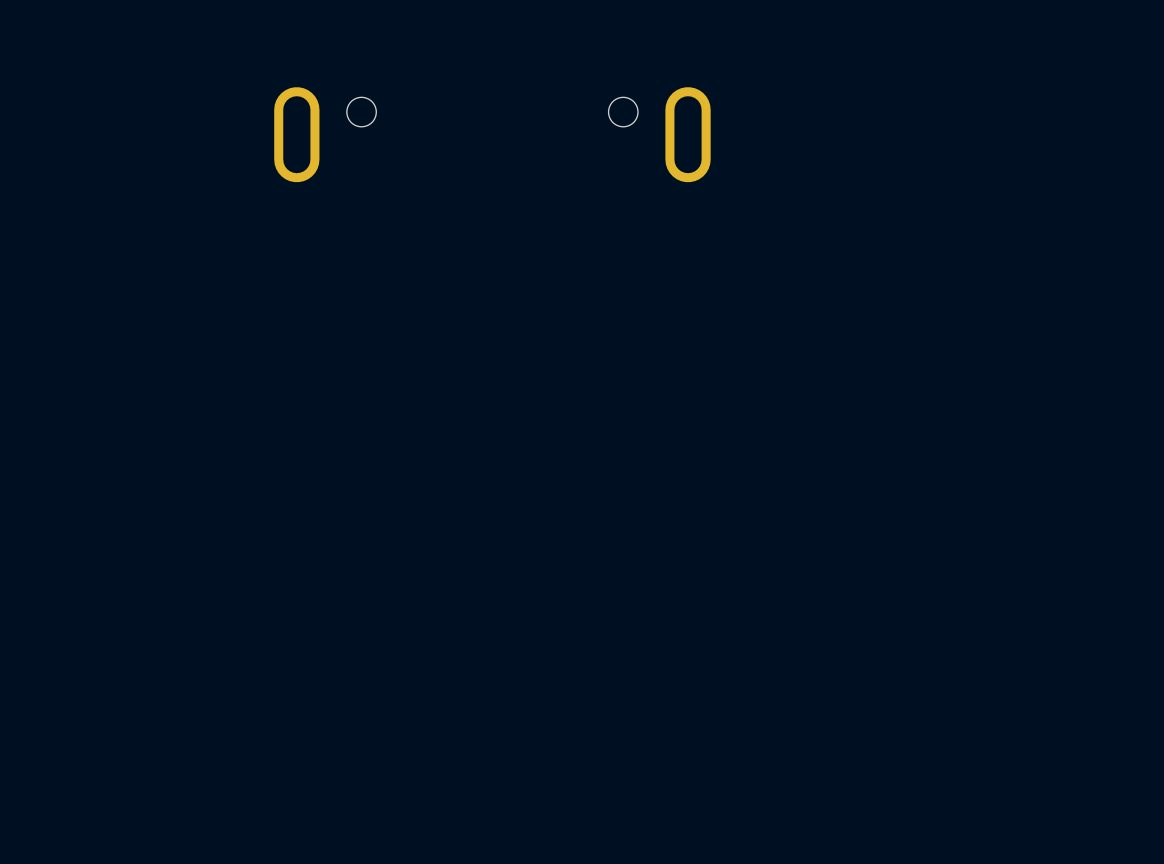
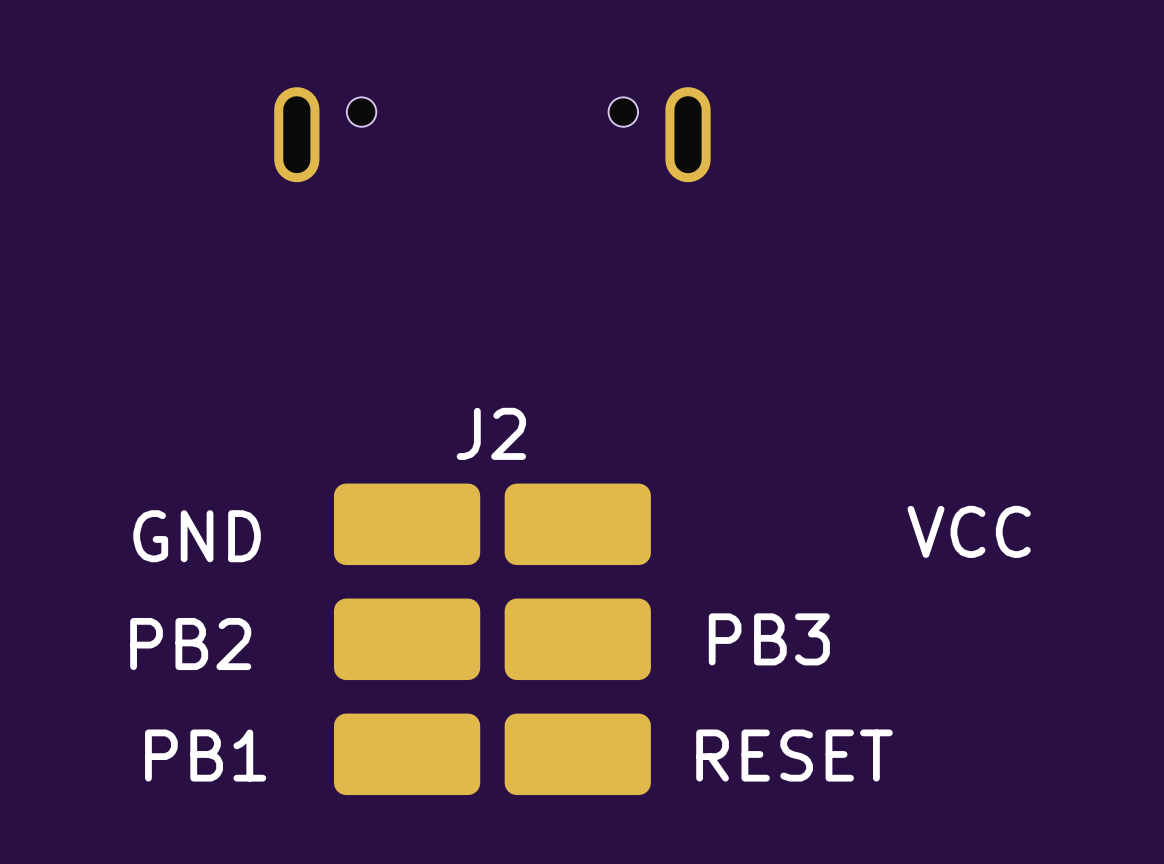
text: none -> VCC (969, 531)
text: none -> GND (197, 536)
J2: none -> (492, 639)
text: none -> PB3 (769, 639)
text: none -> PB2 (190, 644)
text: none -> PB1 (205, 755)
text: none -> RESET (794, 755)

